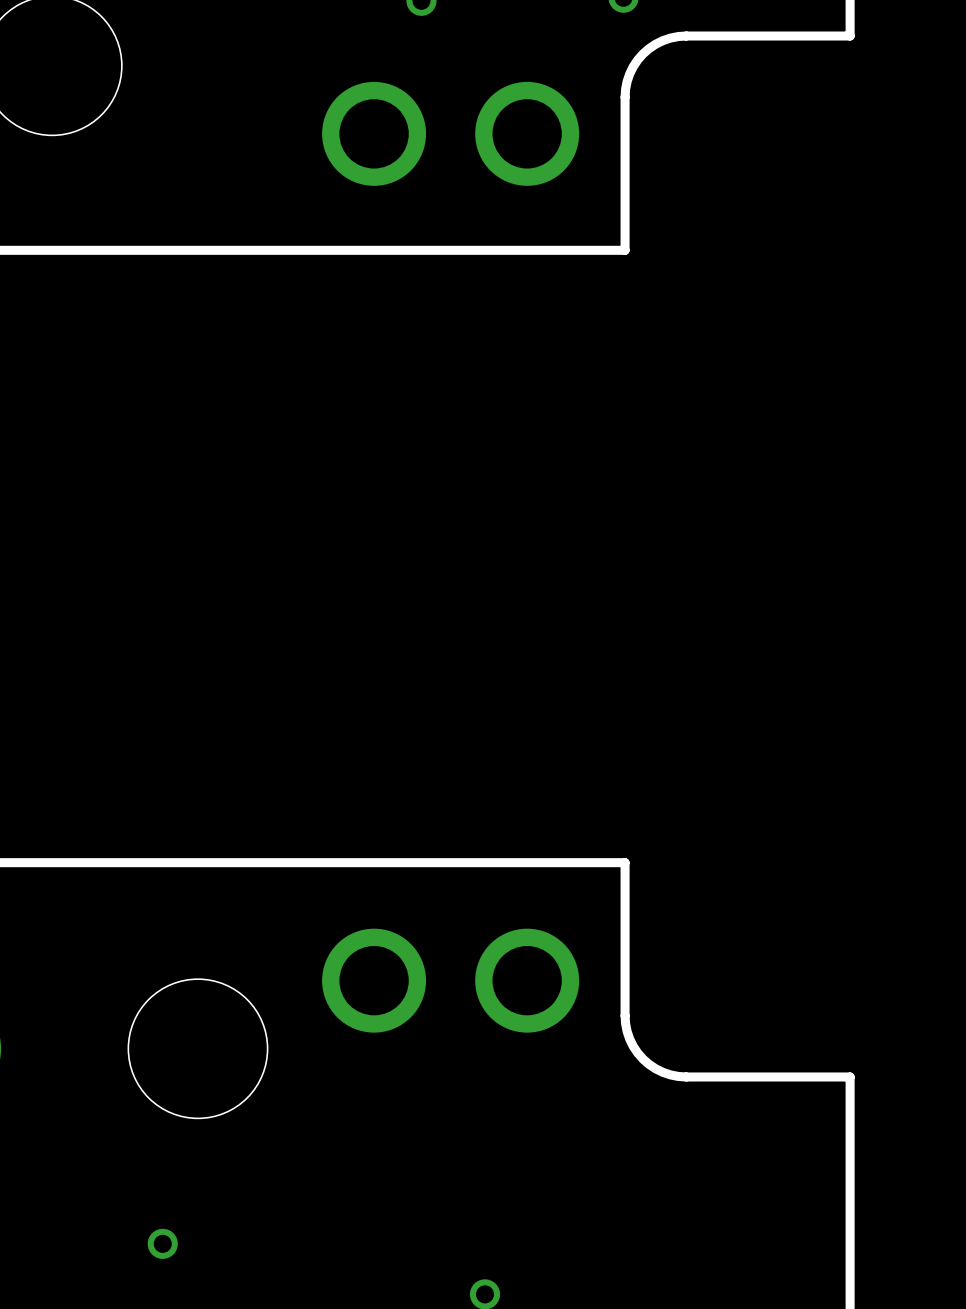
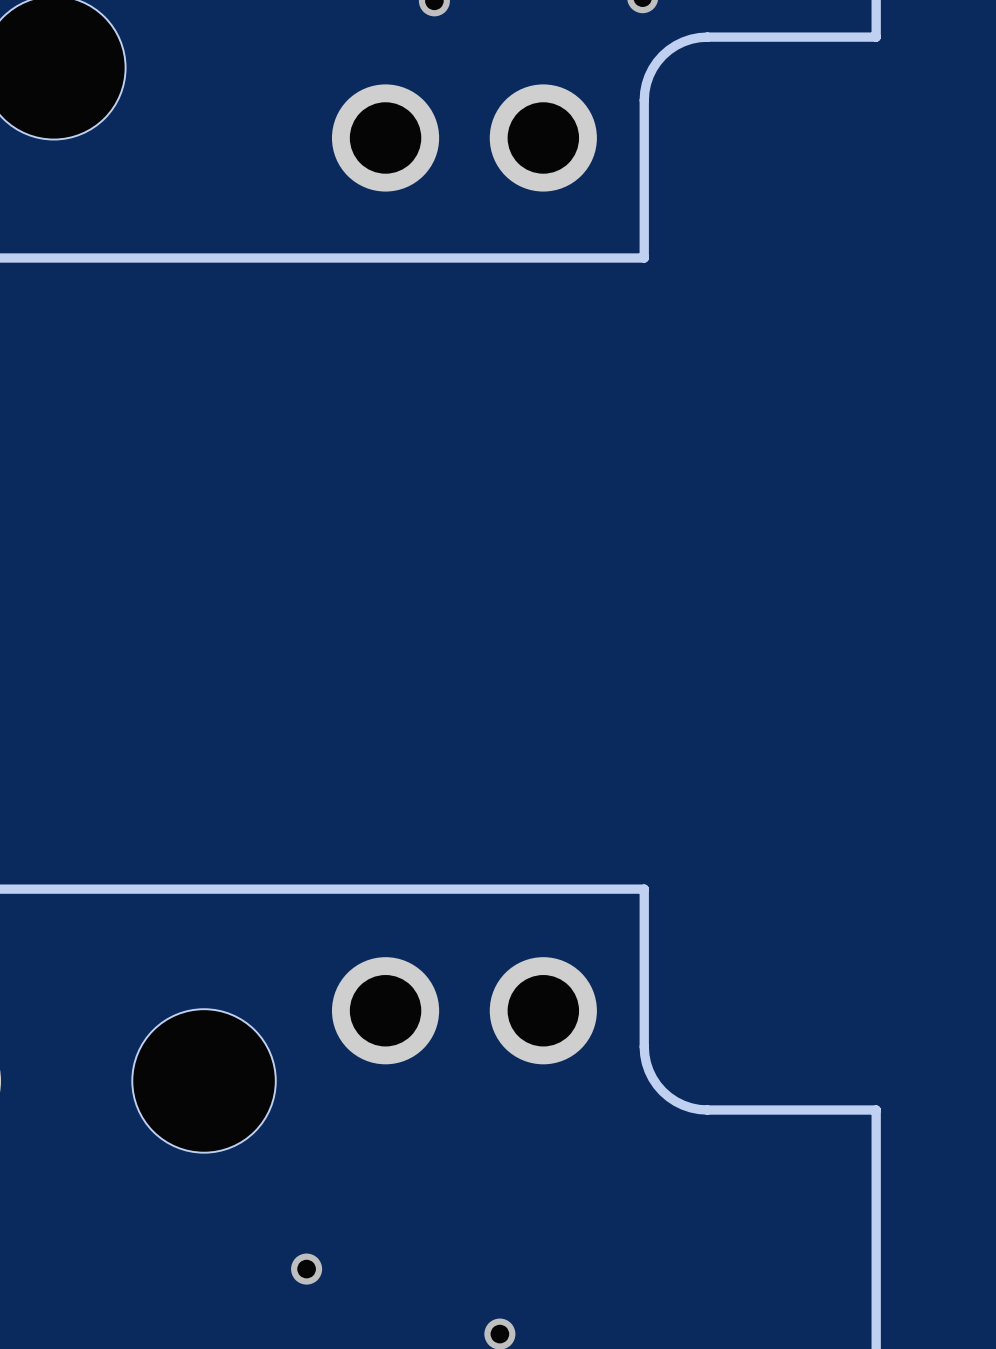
via: none -> (306, 1269)
via: (162, 1243) -> none

